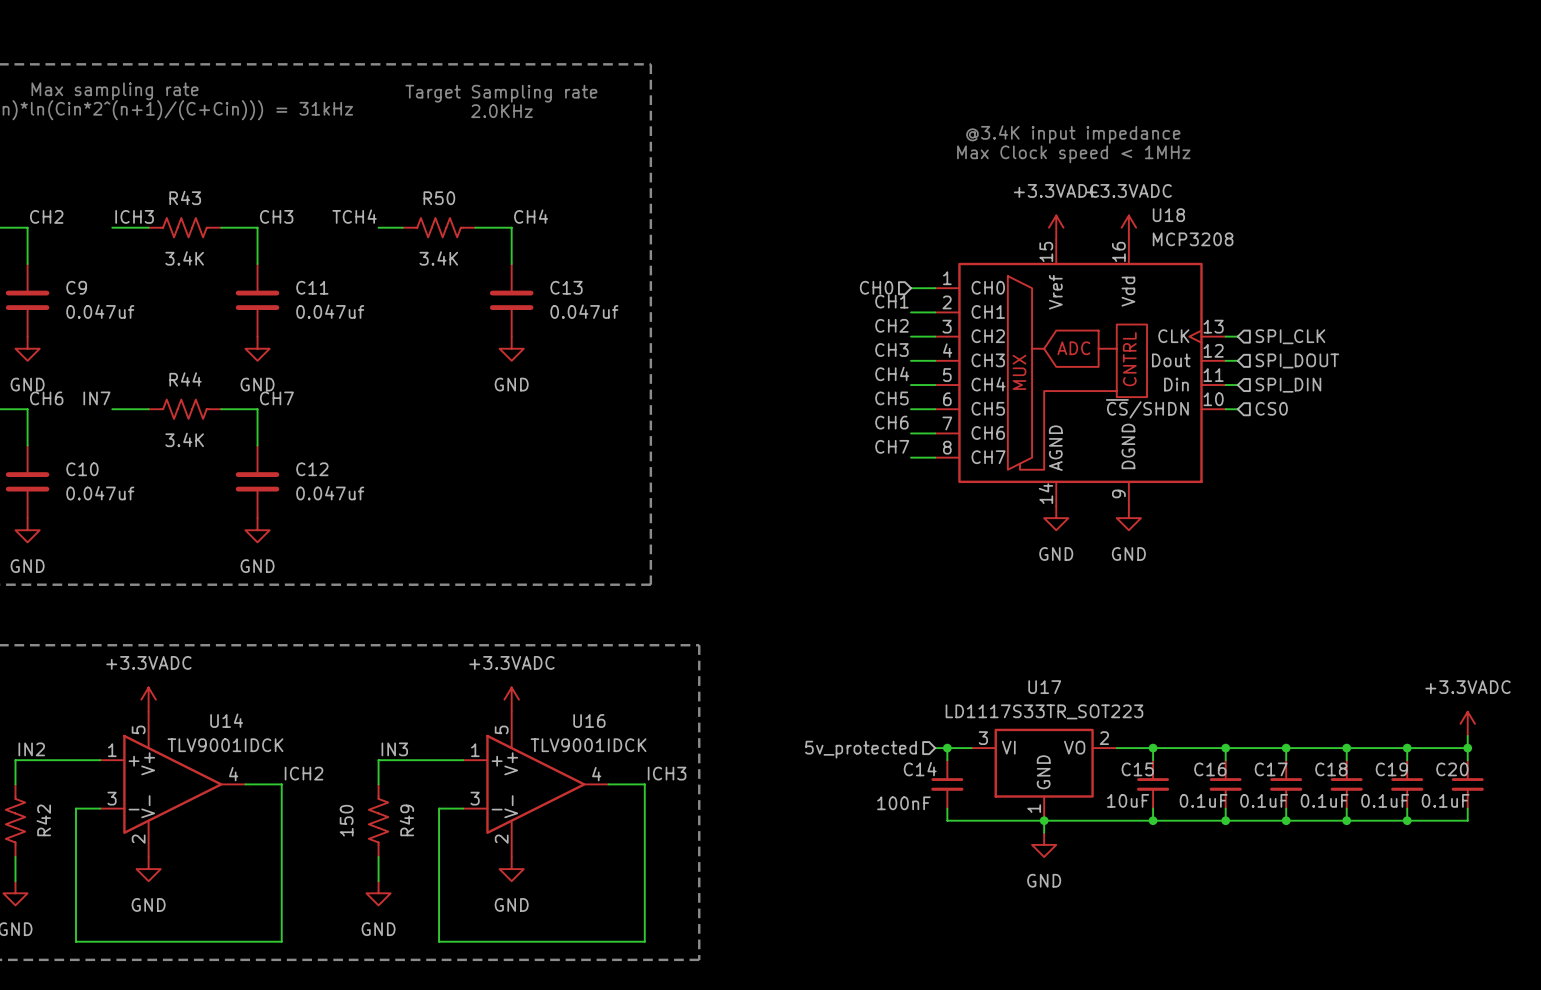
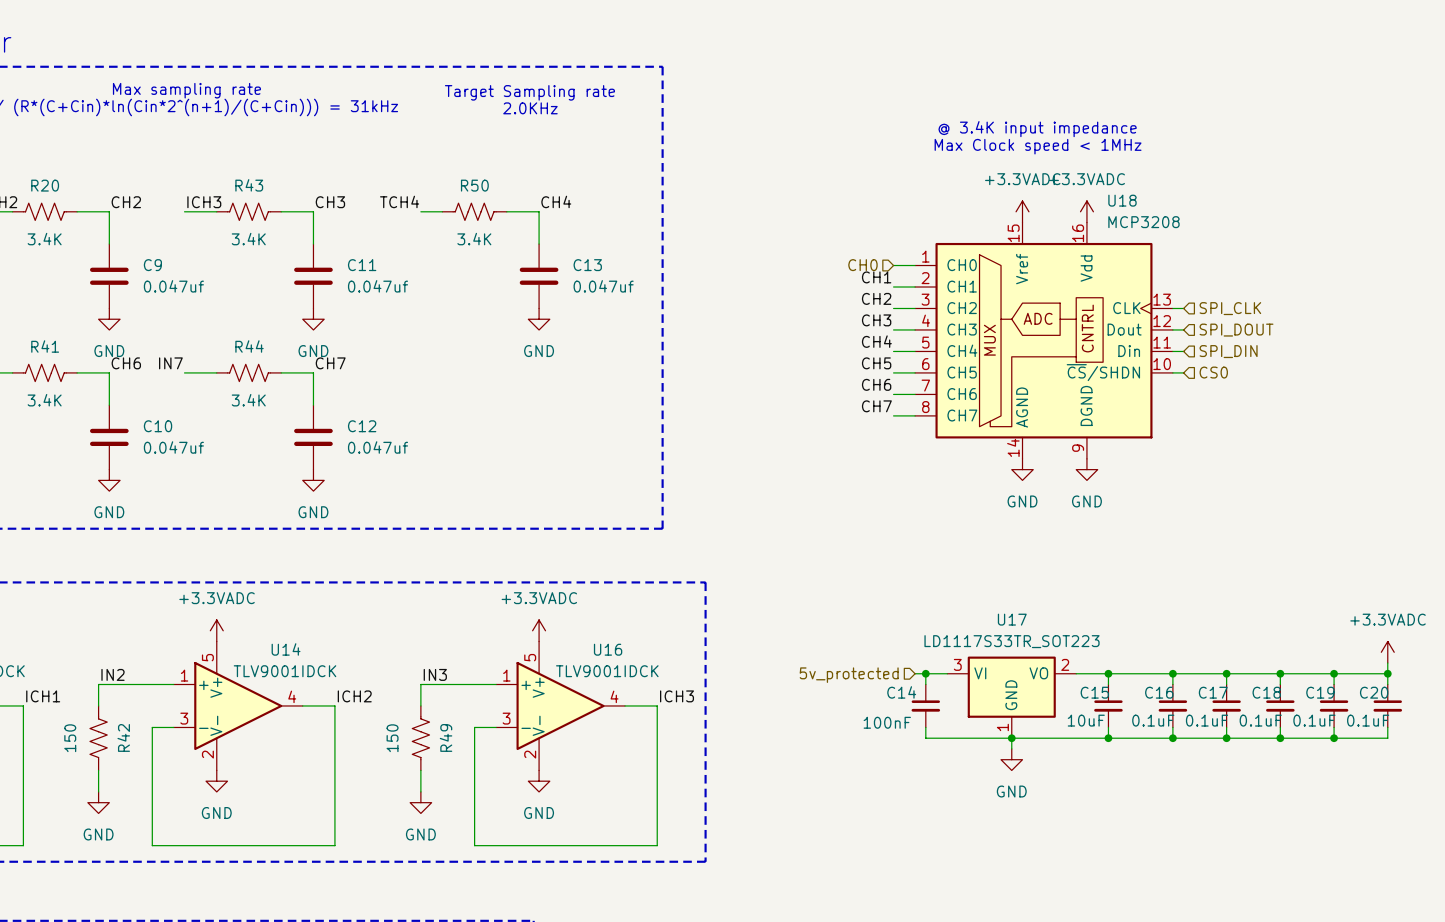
text: @3.4K input impedance (1073, 134) -> @ 3.4K input impedance (1037, 129)

